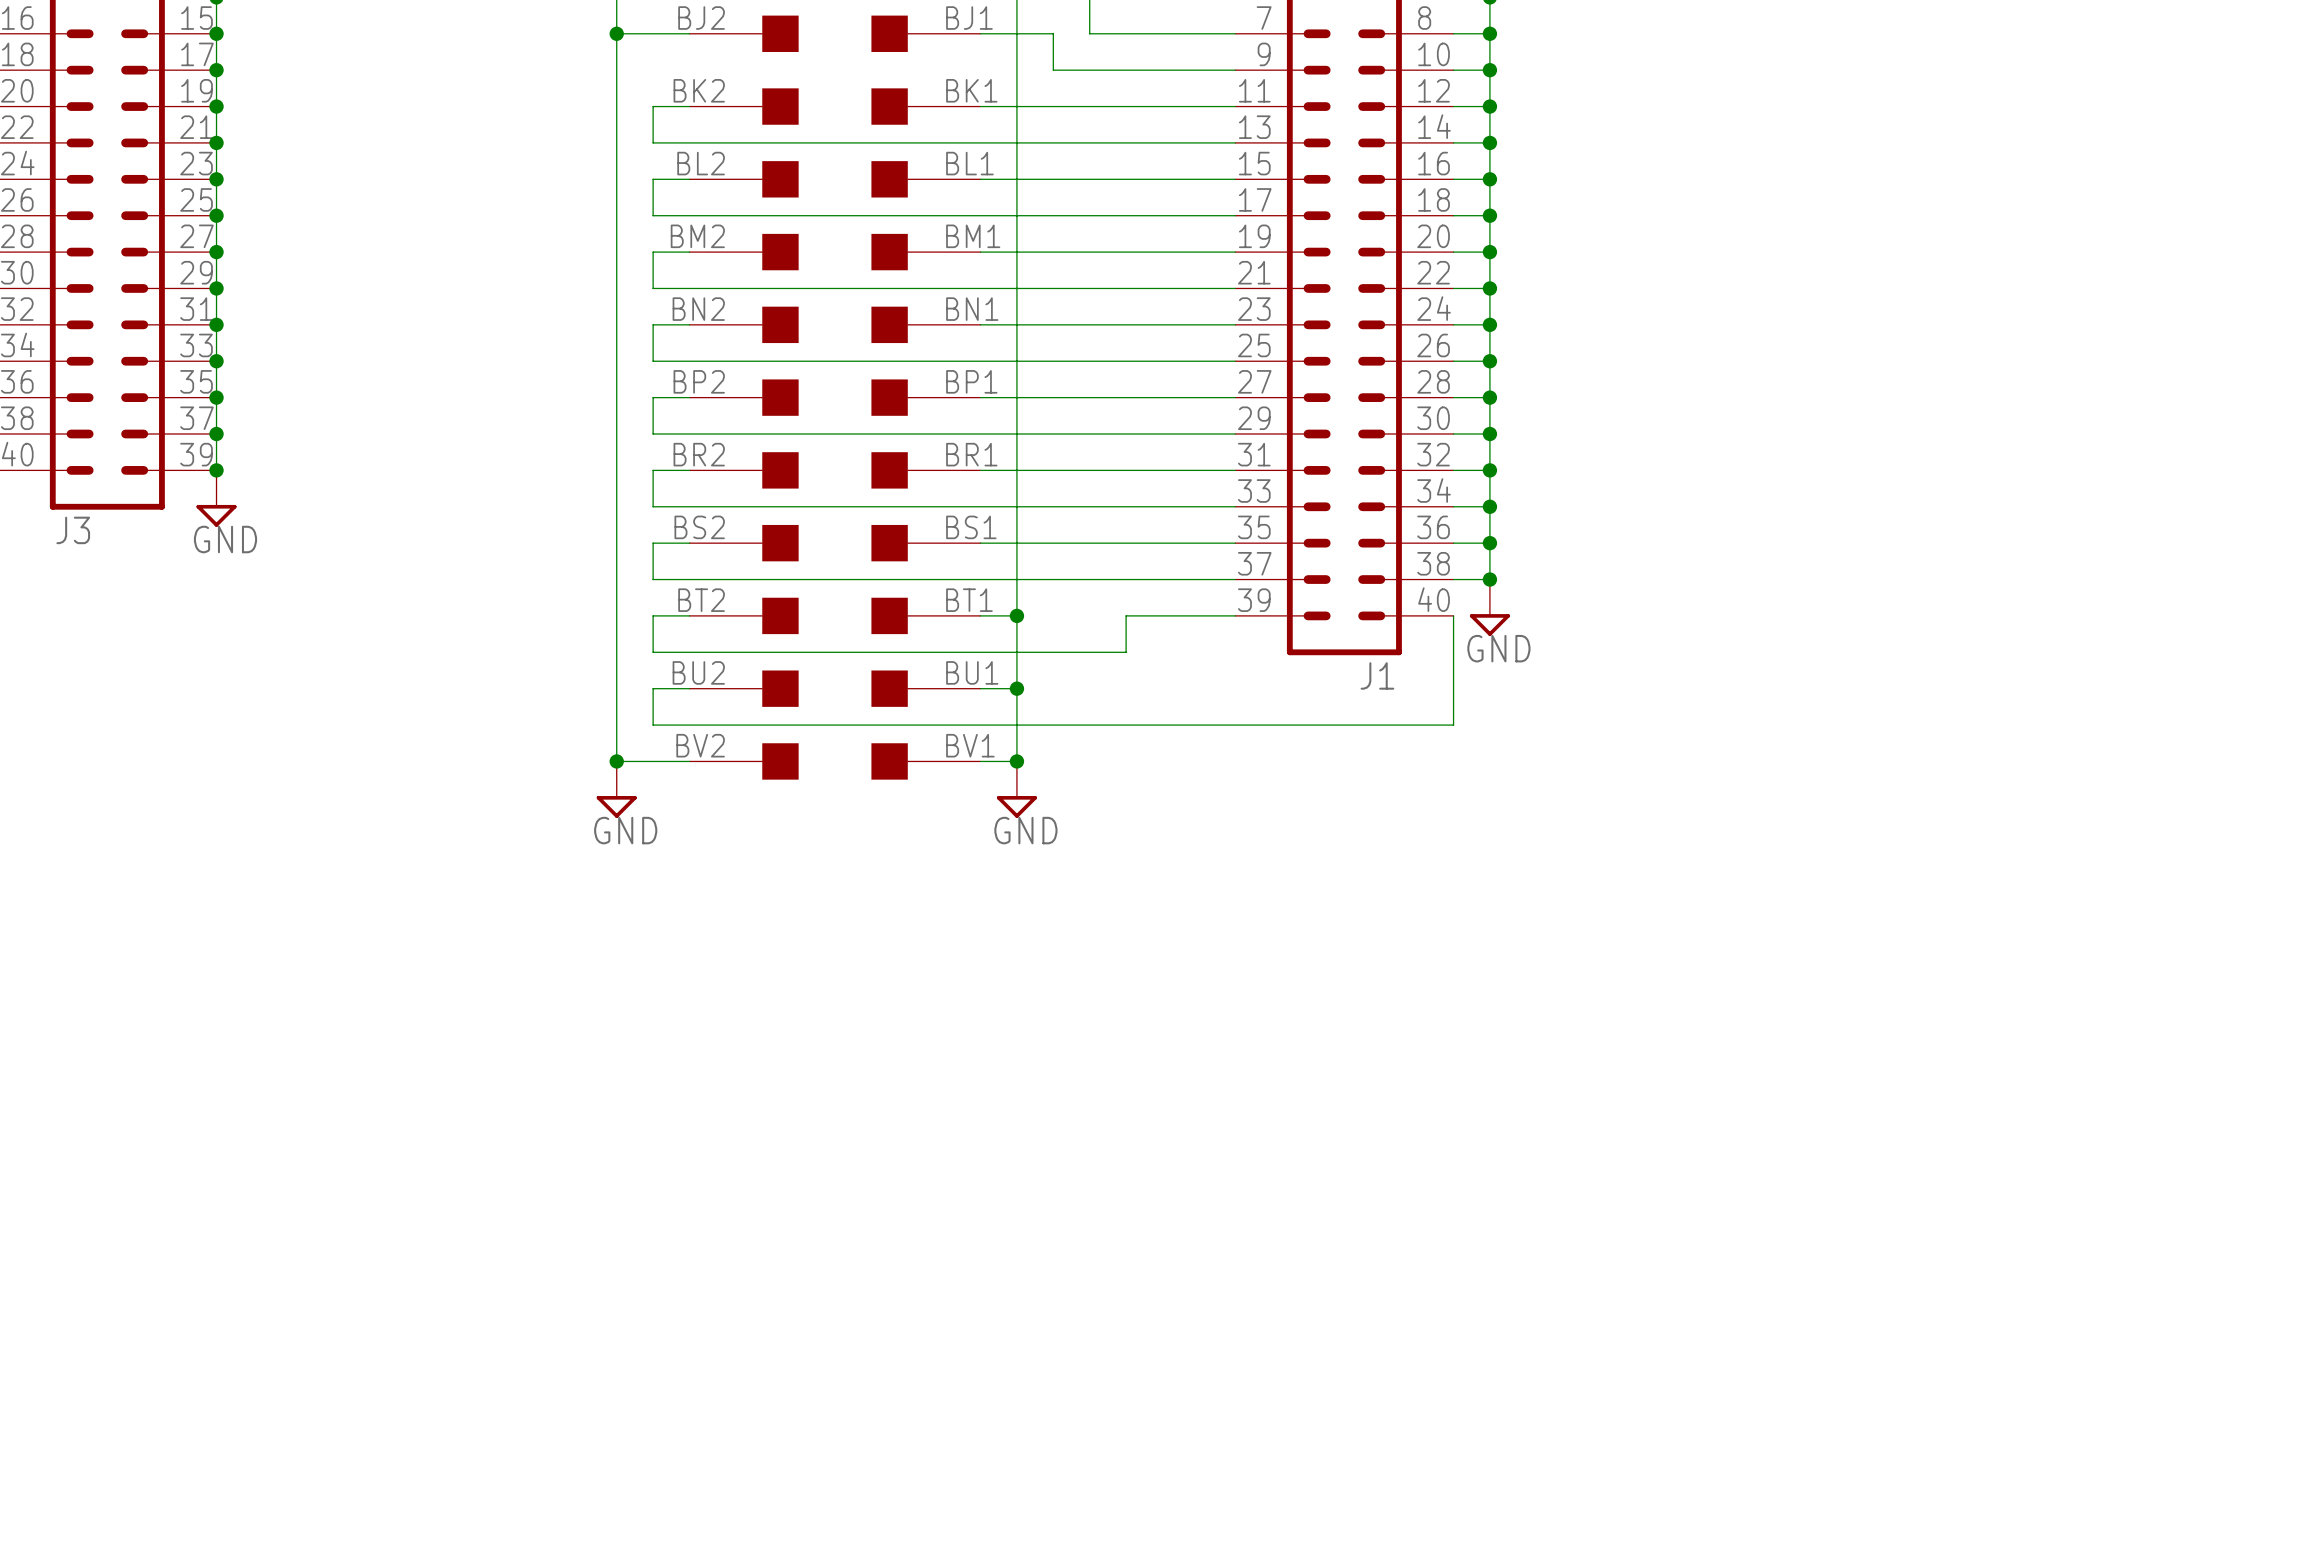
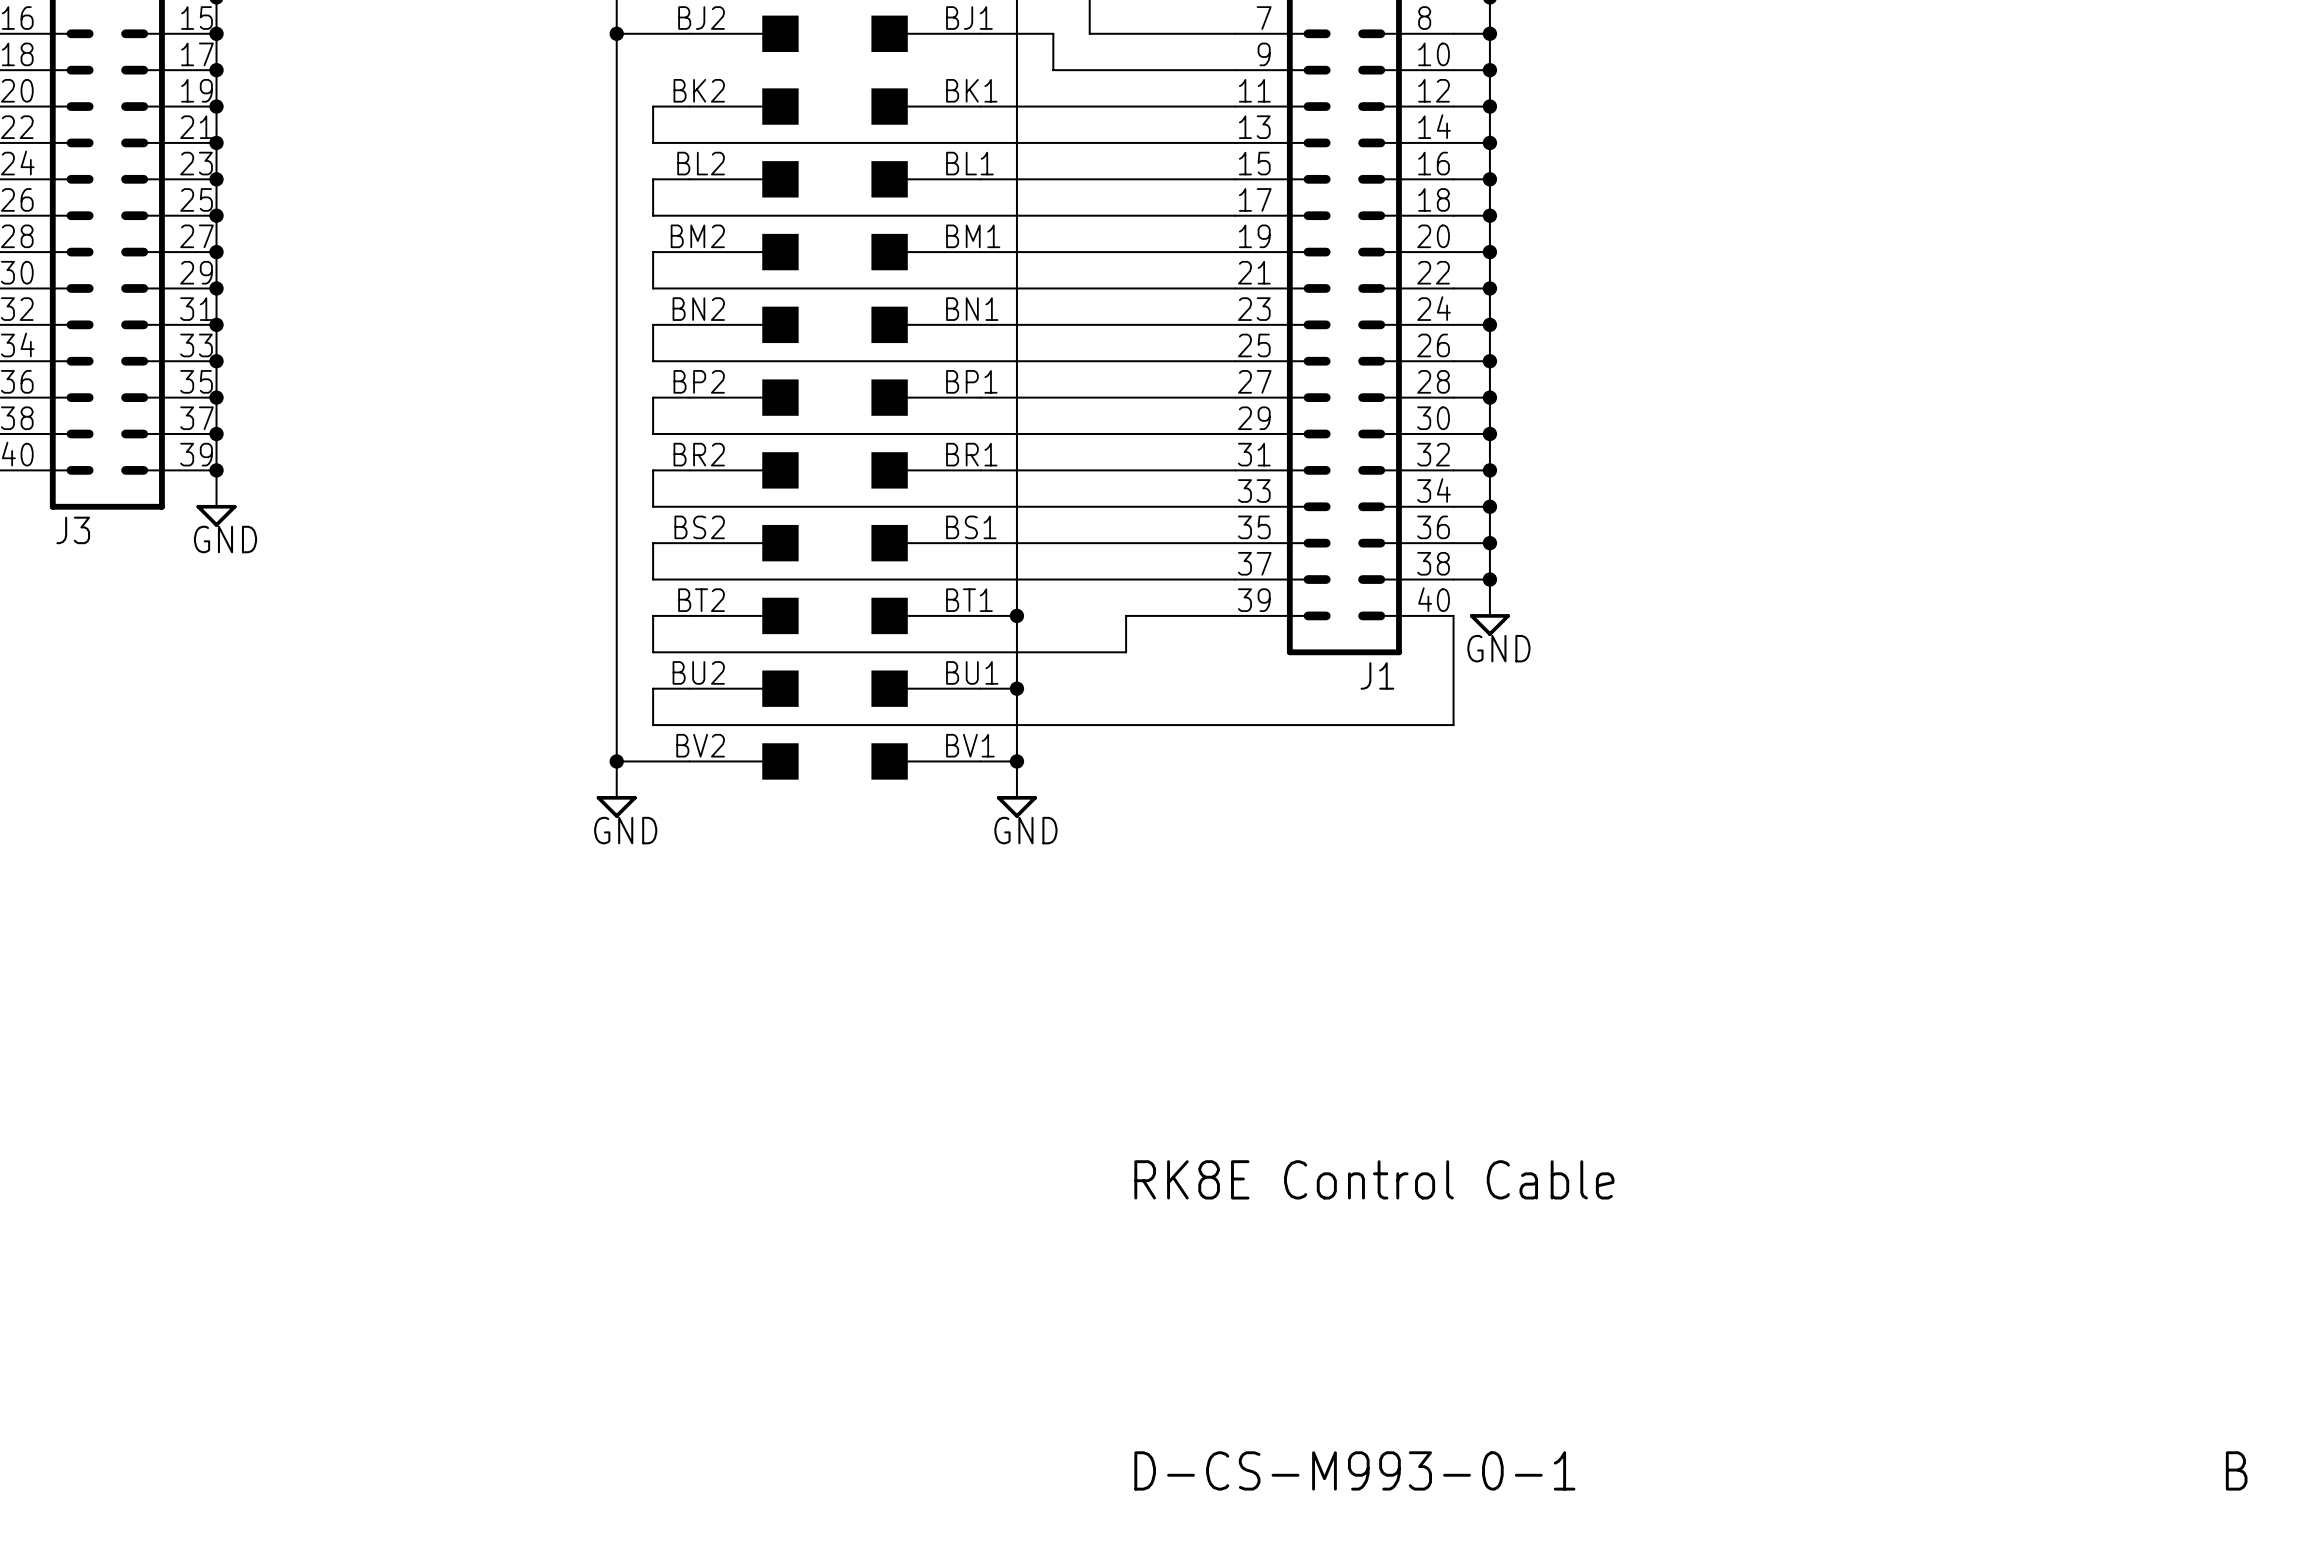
text: none -> RK8E Control Cable (1374, 1179)
text: none -> D-CS-M993-0-1 (1354, 1470)
text: none -> B (2236, 1470)

